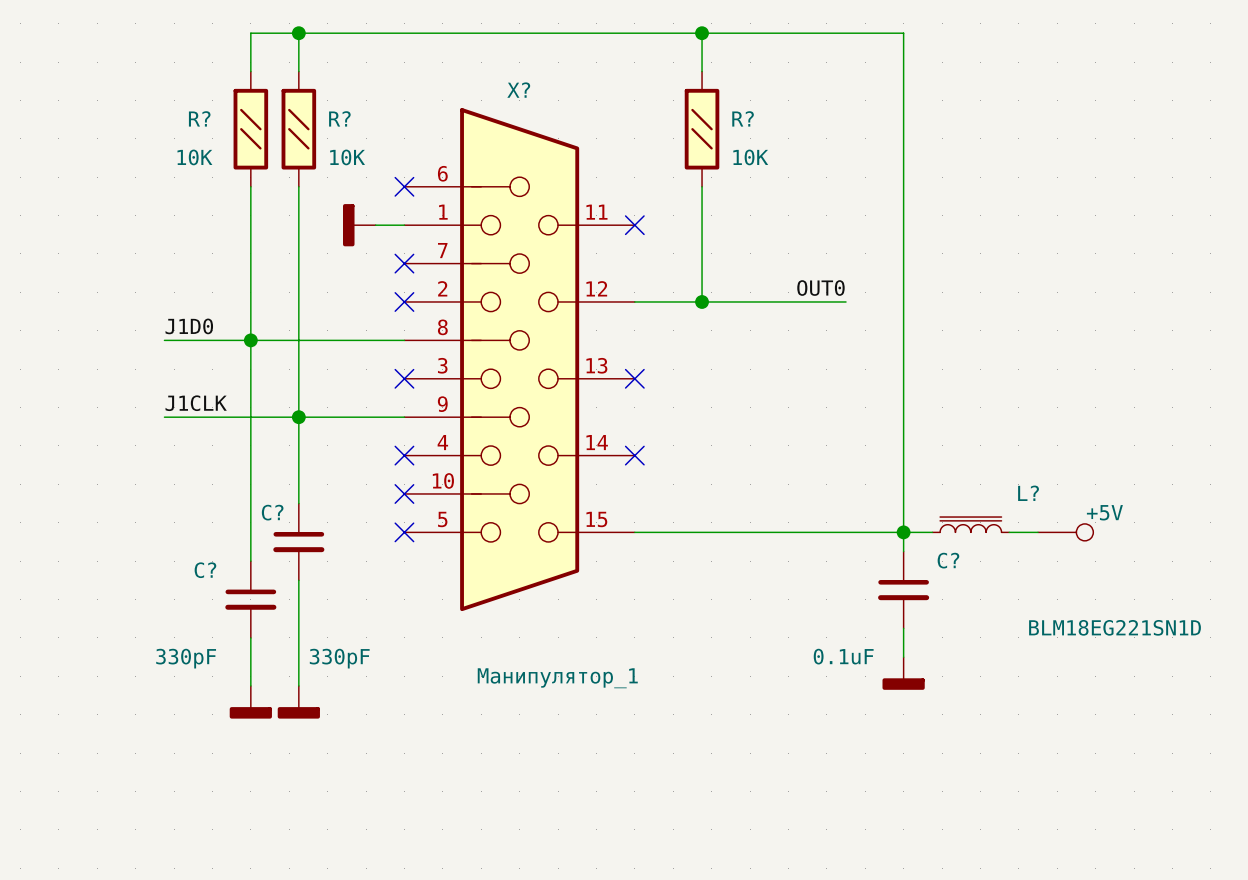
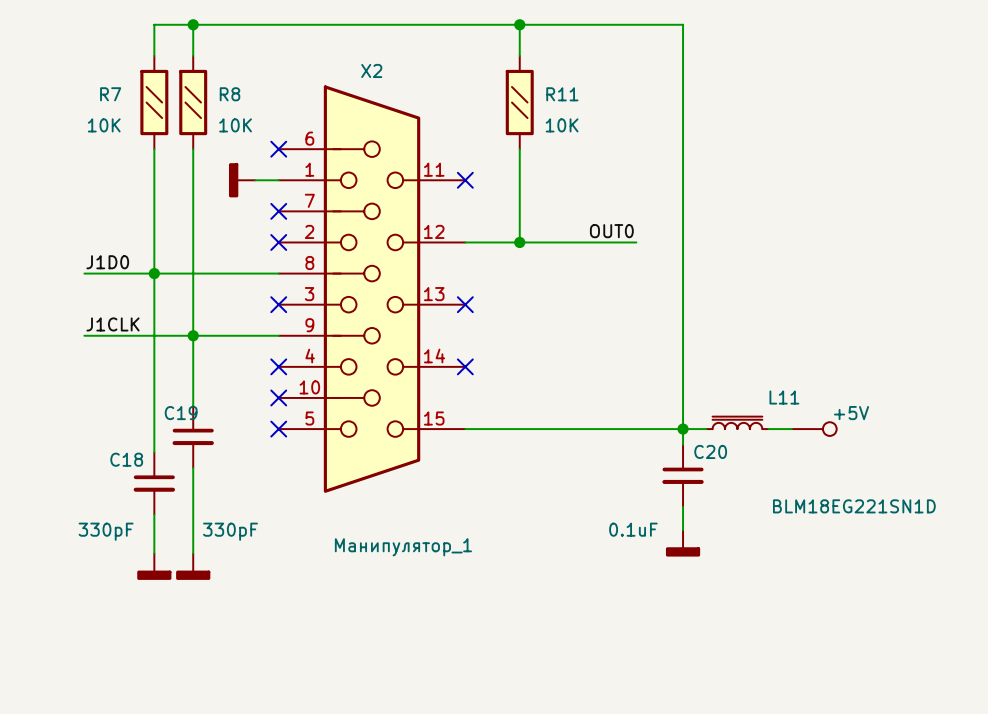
X? name: X? (518, 90) -> X2 (371, 70)
R? name: R? (199, 118) -> R7 (110, 94)
R? name: R? (339, 118) -> R8 (230, 94)
R? name: R? (743, 118) -> R11 (562, 94)
C? name: C? (272, 512) -> C19 (181, 413)
L?: BLM18EG221SN1D (970, 524) -> none
L11: none -> BLM18EG221SN1D (737, 422)
C? name: C? (948, 560) -> C20 (710, 451)
C? name: C? (205, 570) -> C18 (126, 459)

